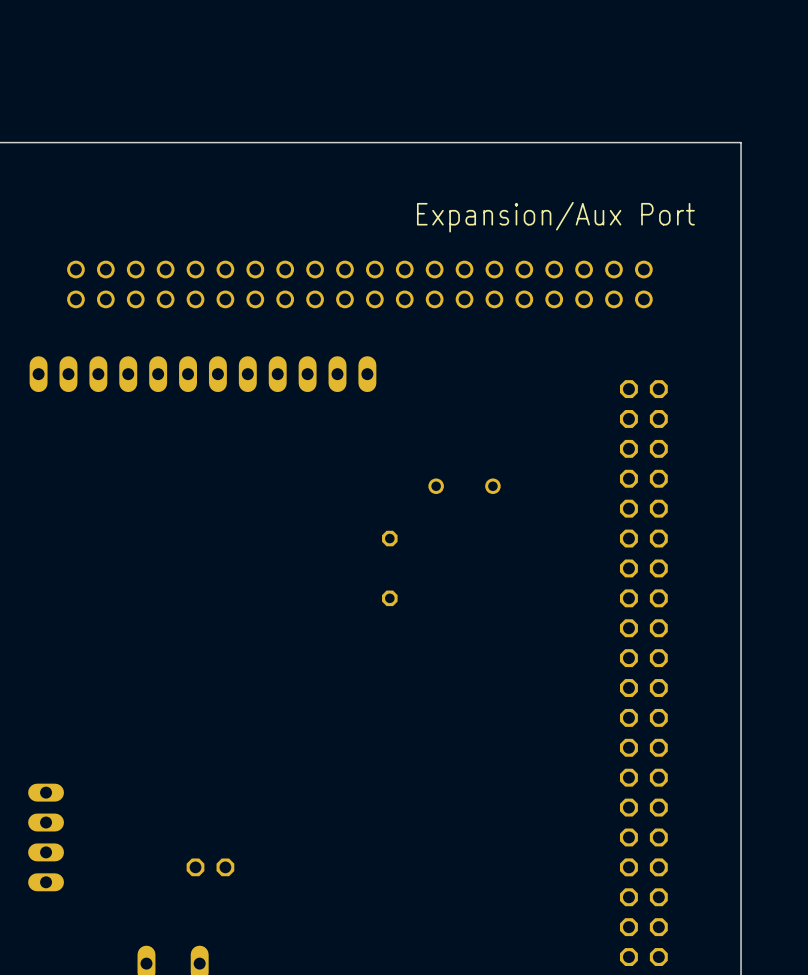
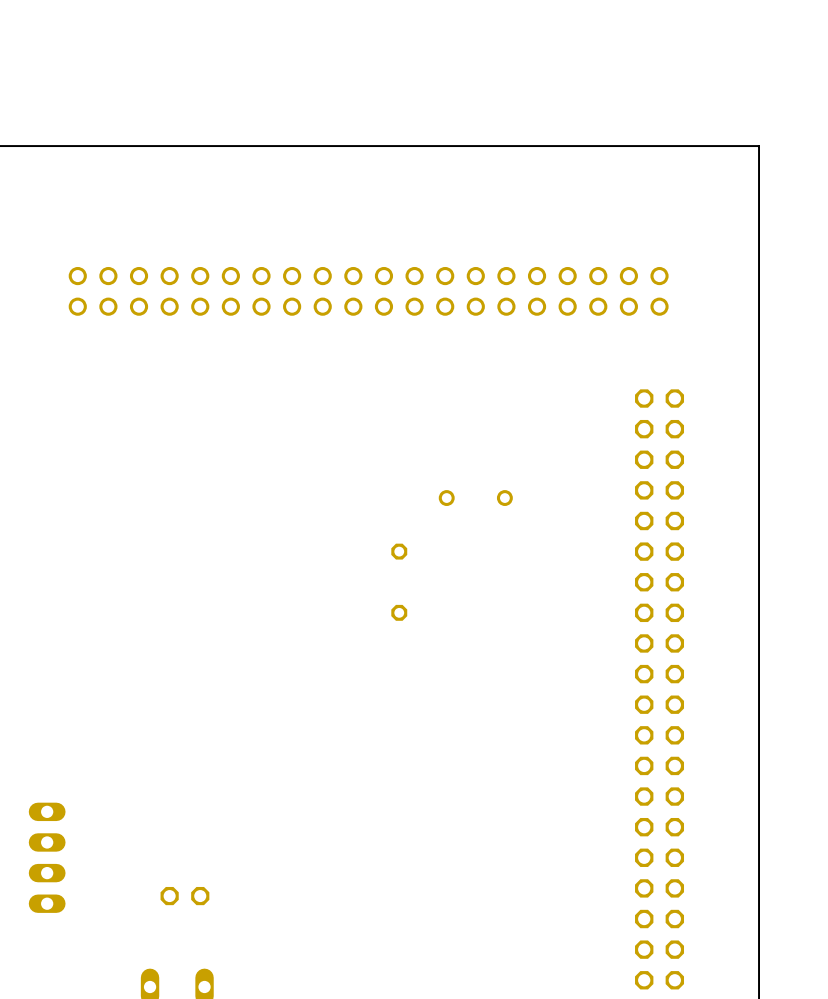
text: Expansion/Aux Port (555, 217) -> none
part: (202, 374) -> none
part position: (210, 867) -> (184, 896)

